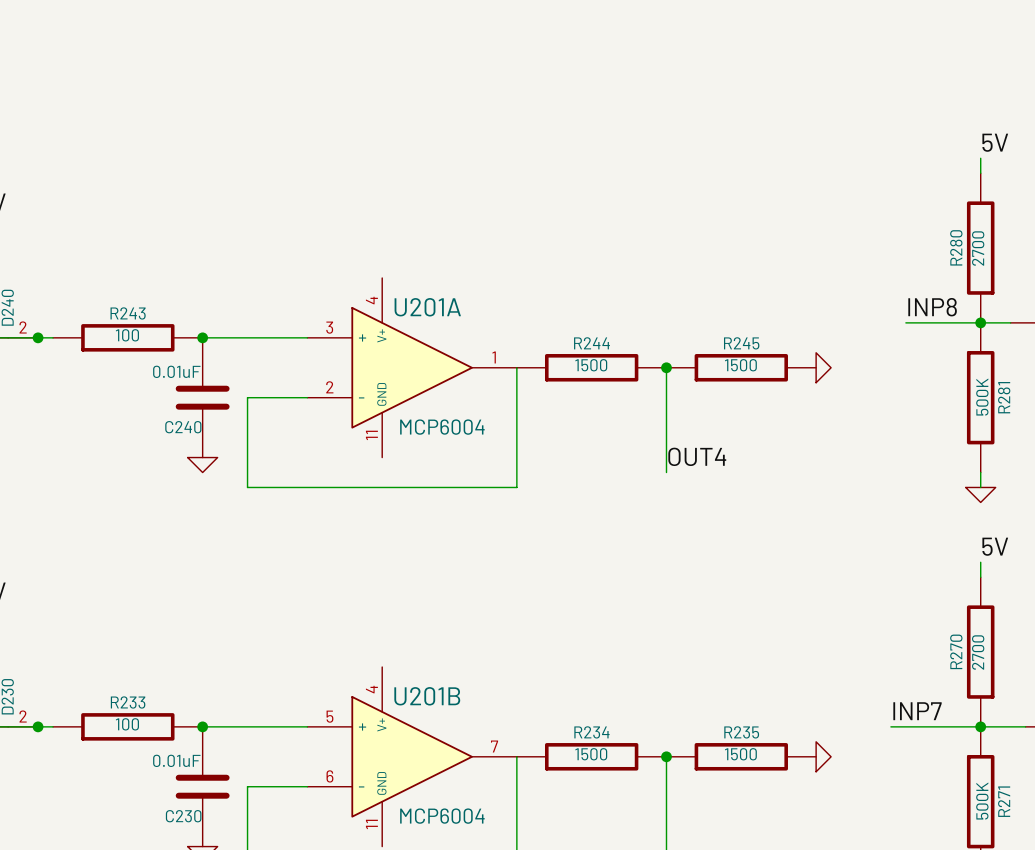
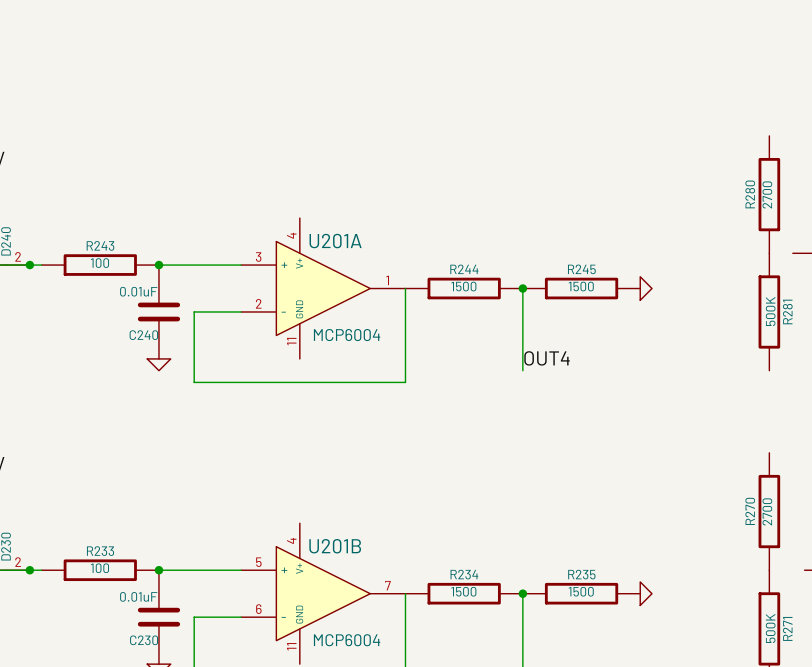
label: 5V (995, 142) -> none
wire: (980, 158) (980, 173) -> none
label: INP8 (932, 307) -> none
wire: (905, 322) (1010, 322) -> none
junction: (980, 322) -> none
wire: (980, 472) (980, 487) -> none
power symbol: (980, 494) -> none
label: 5V (995, 546) -> none
wire: (980, 562) (980, 577) -> none
label: INP7 (917, 711) -> none
wire: (890, 726) (1025, 726) -> none
junction: (980, 726) -> none

